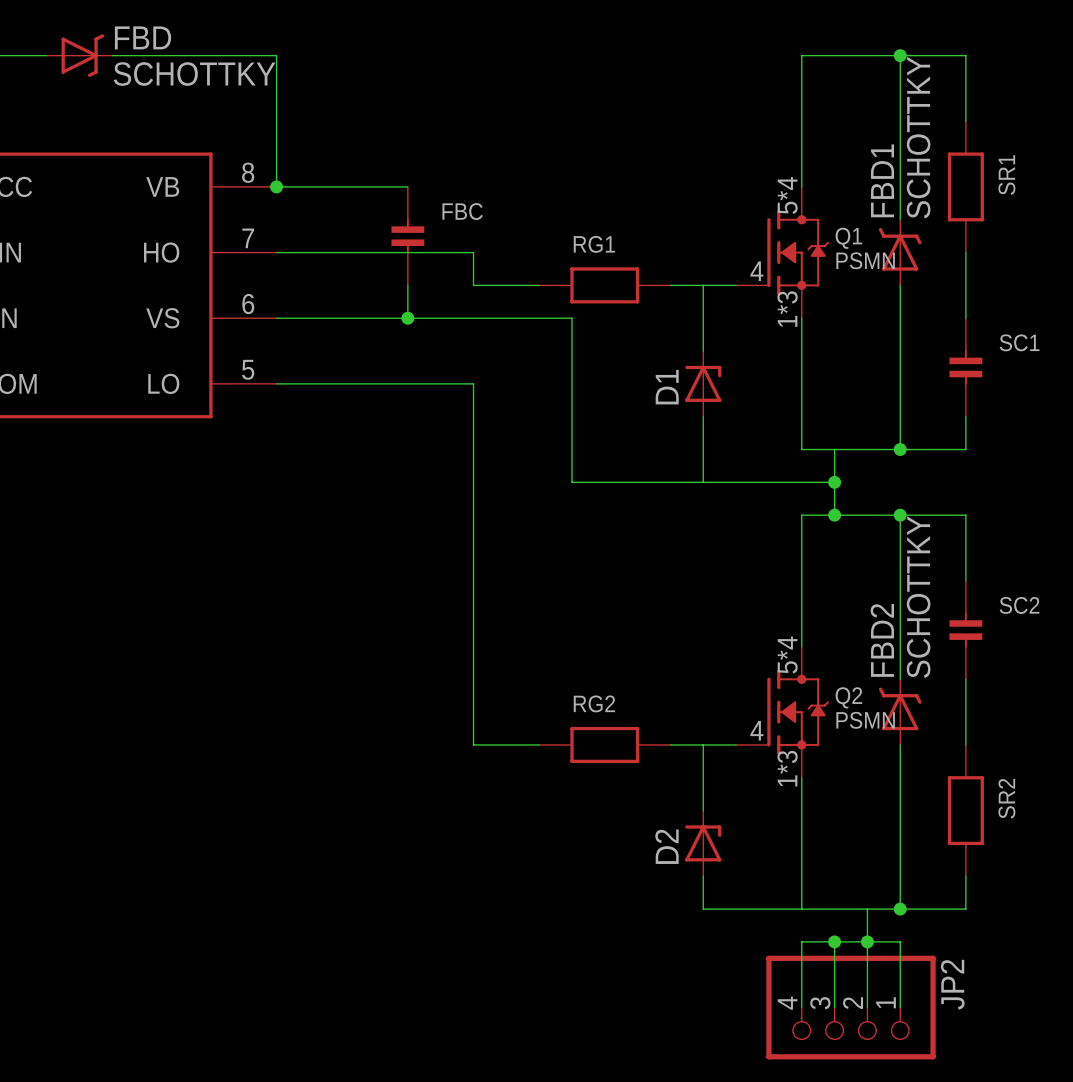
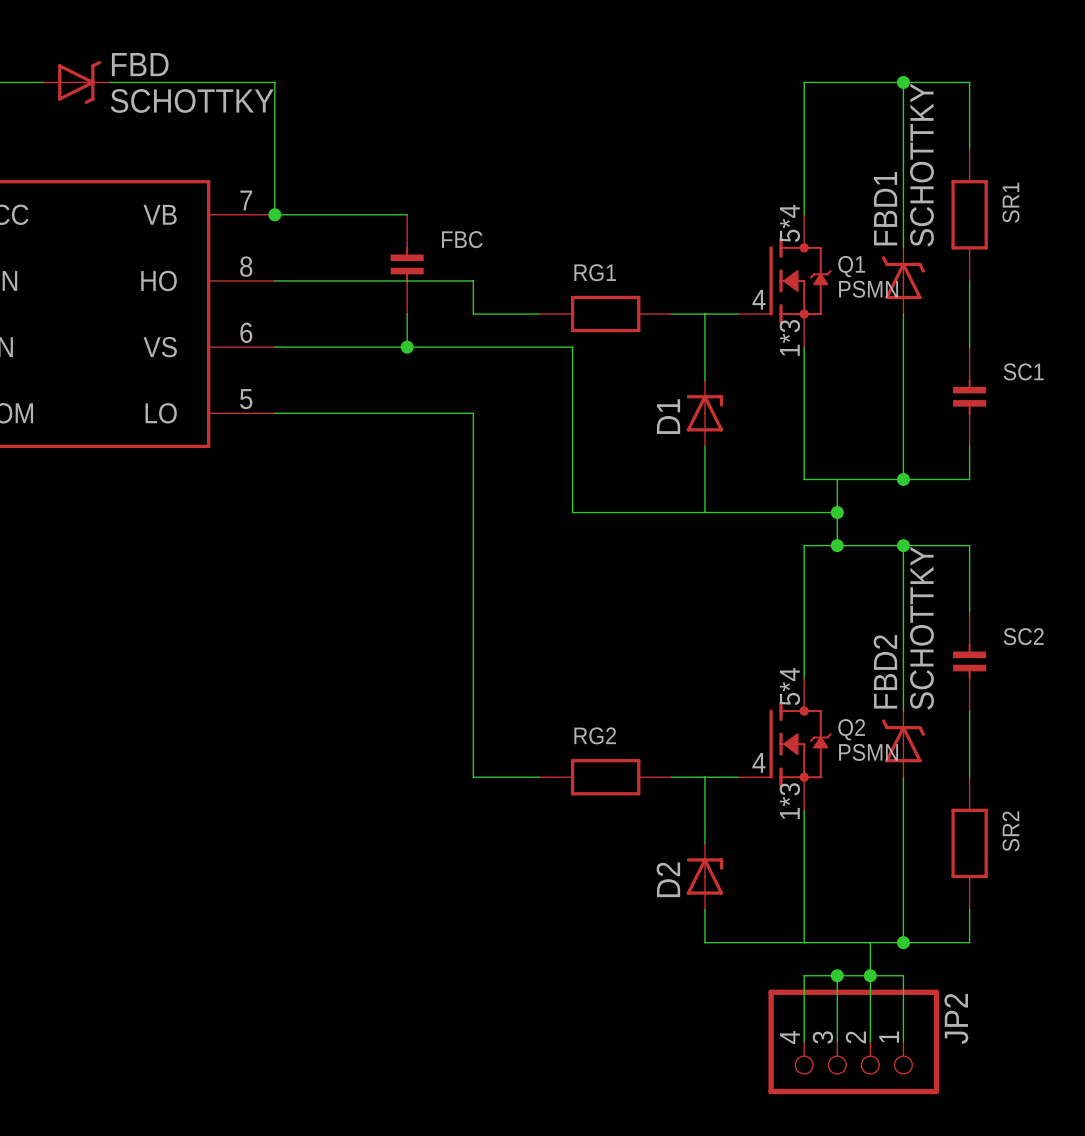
part pin number: 8 (248, 172) -> 7 (246, 200)
part pin number: 7 (248, 238) -> 8 (246, 266)

